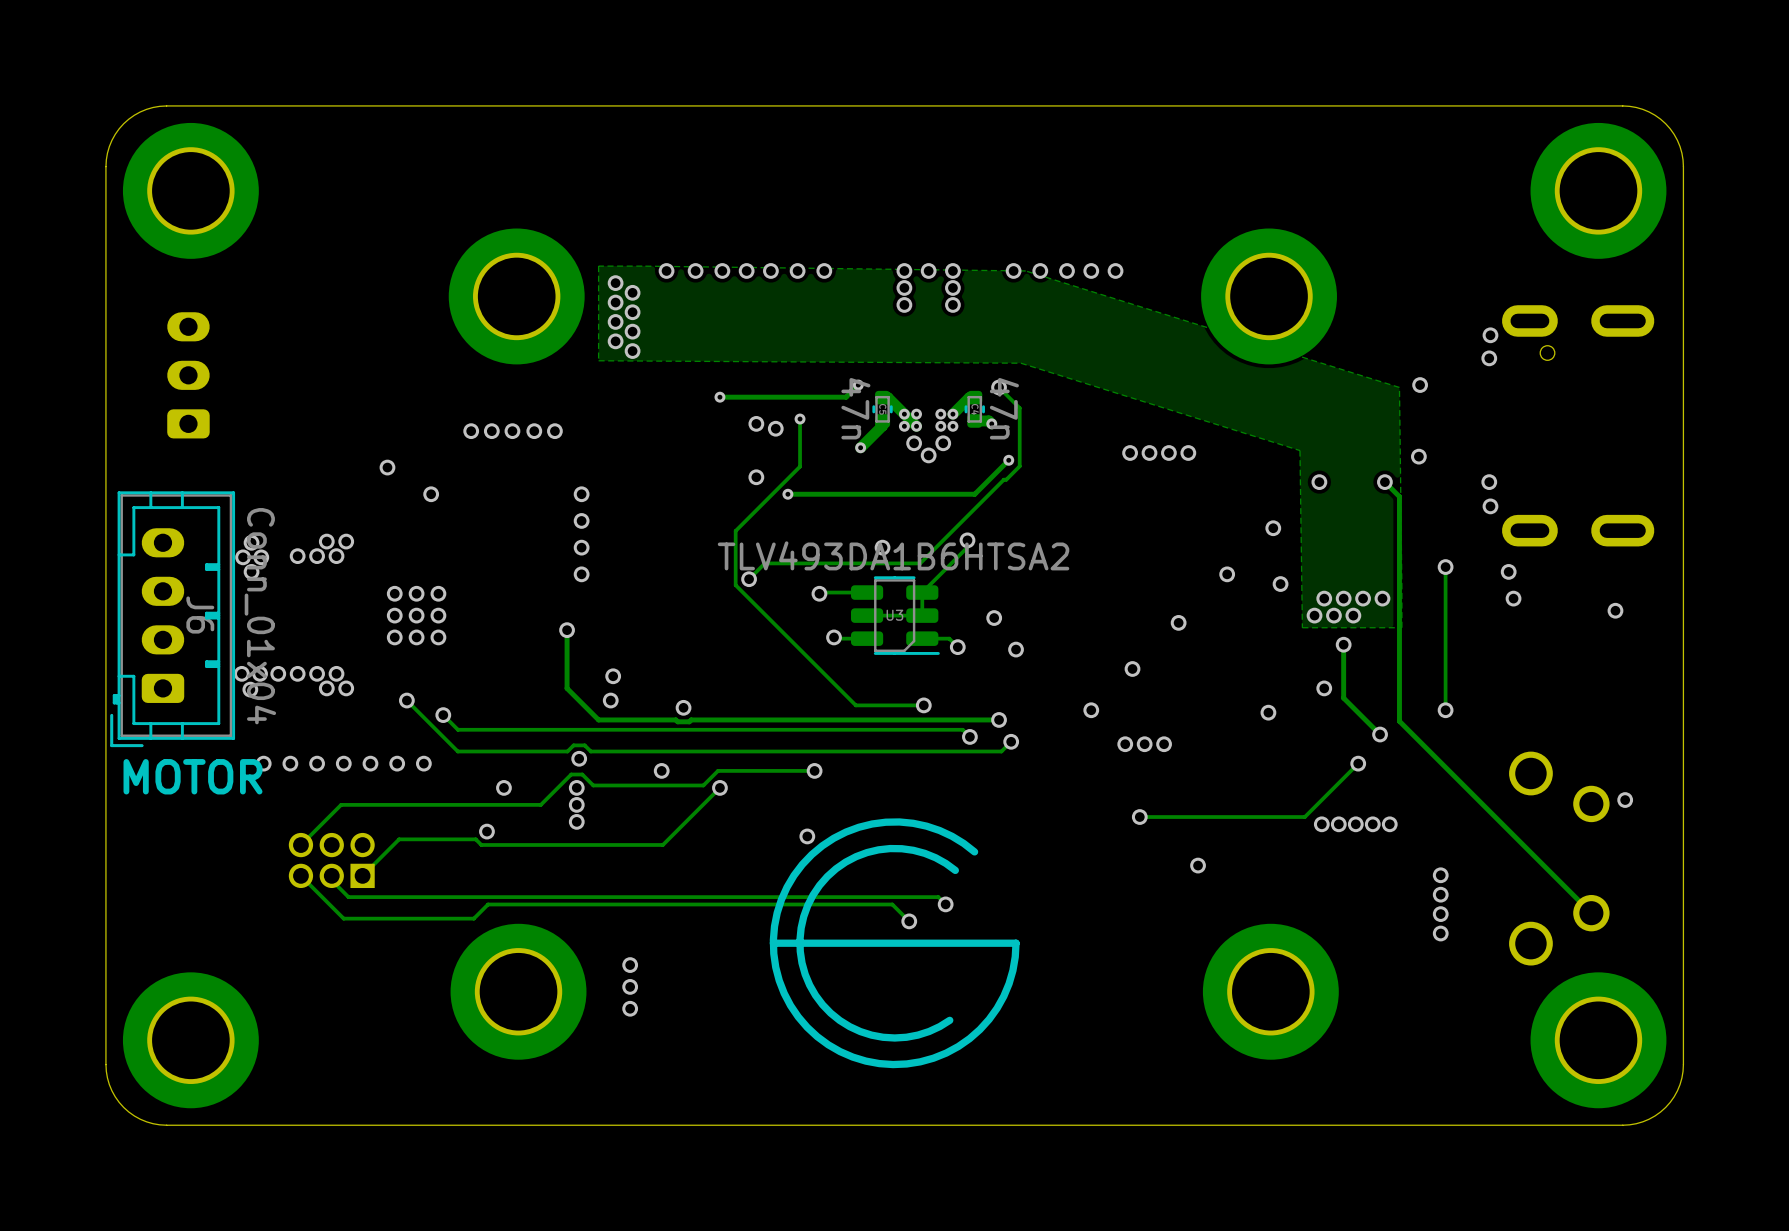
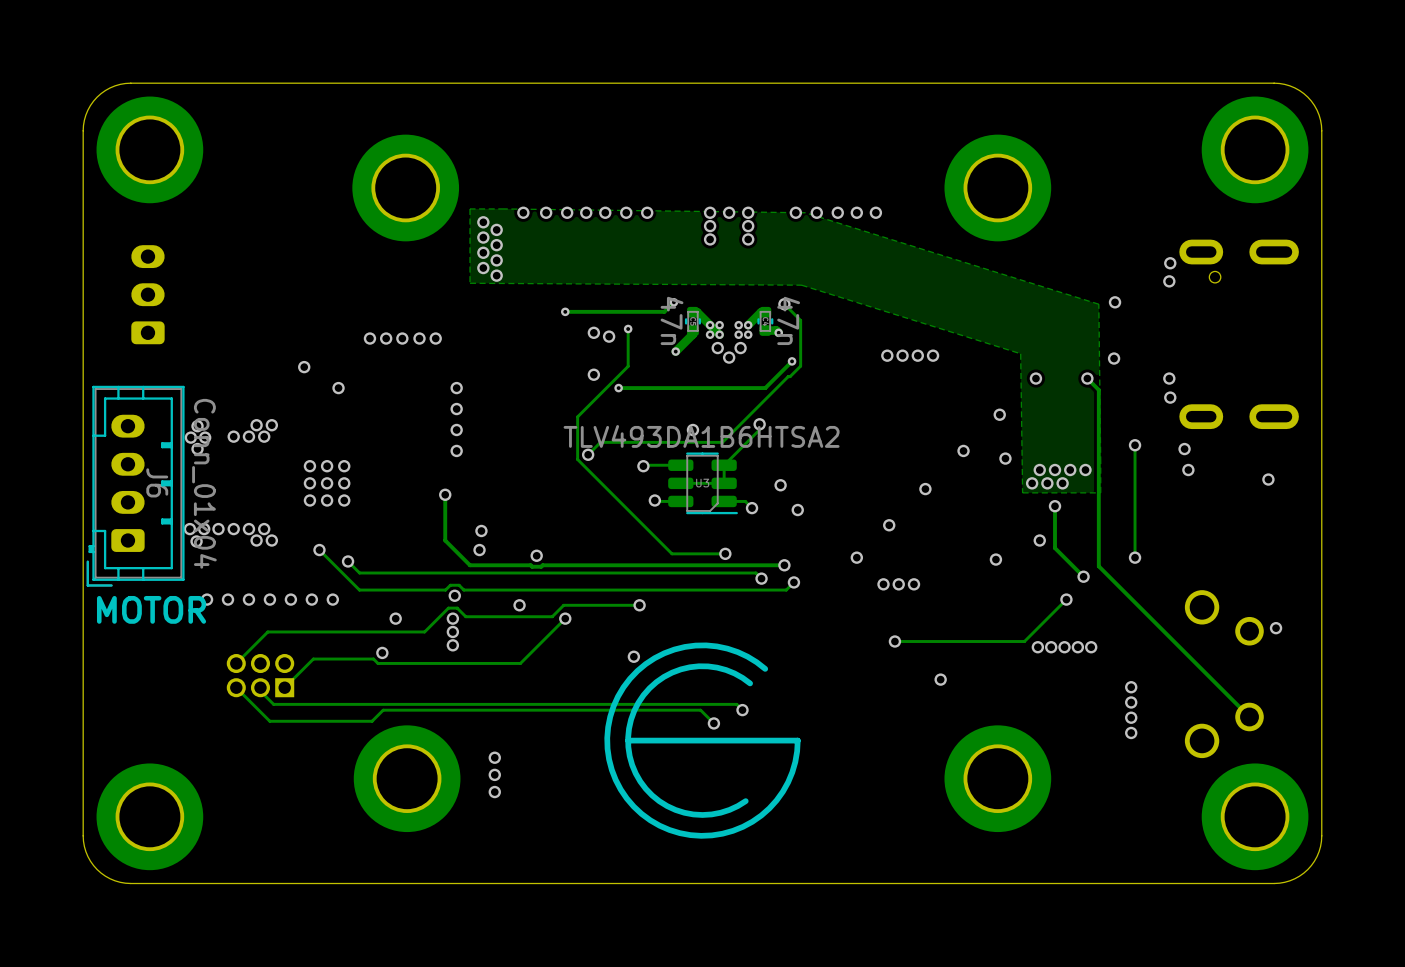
part position: (516, 296) -> (405, 187)
part position: (1269, 296) -> (997, 187)
line: (800, 943) (773, 943) -> none

